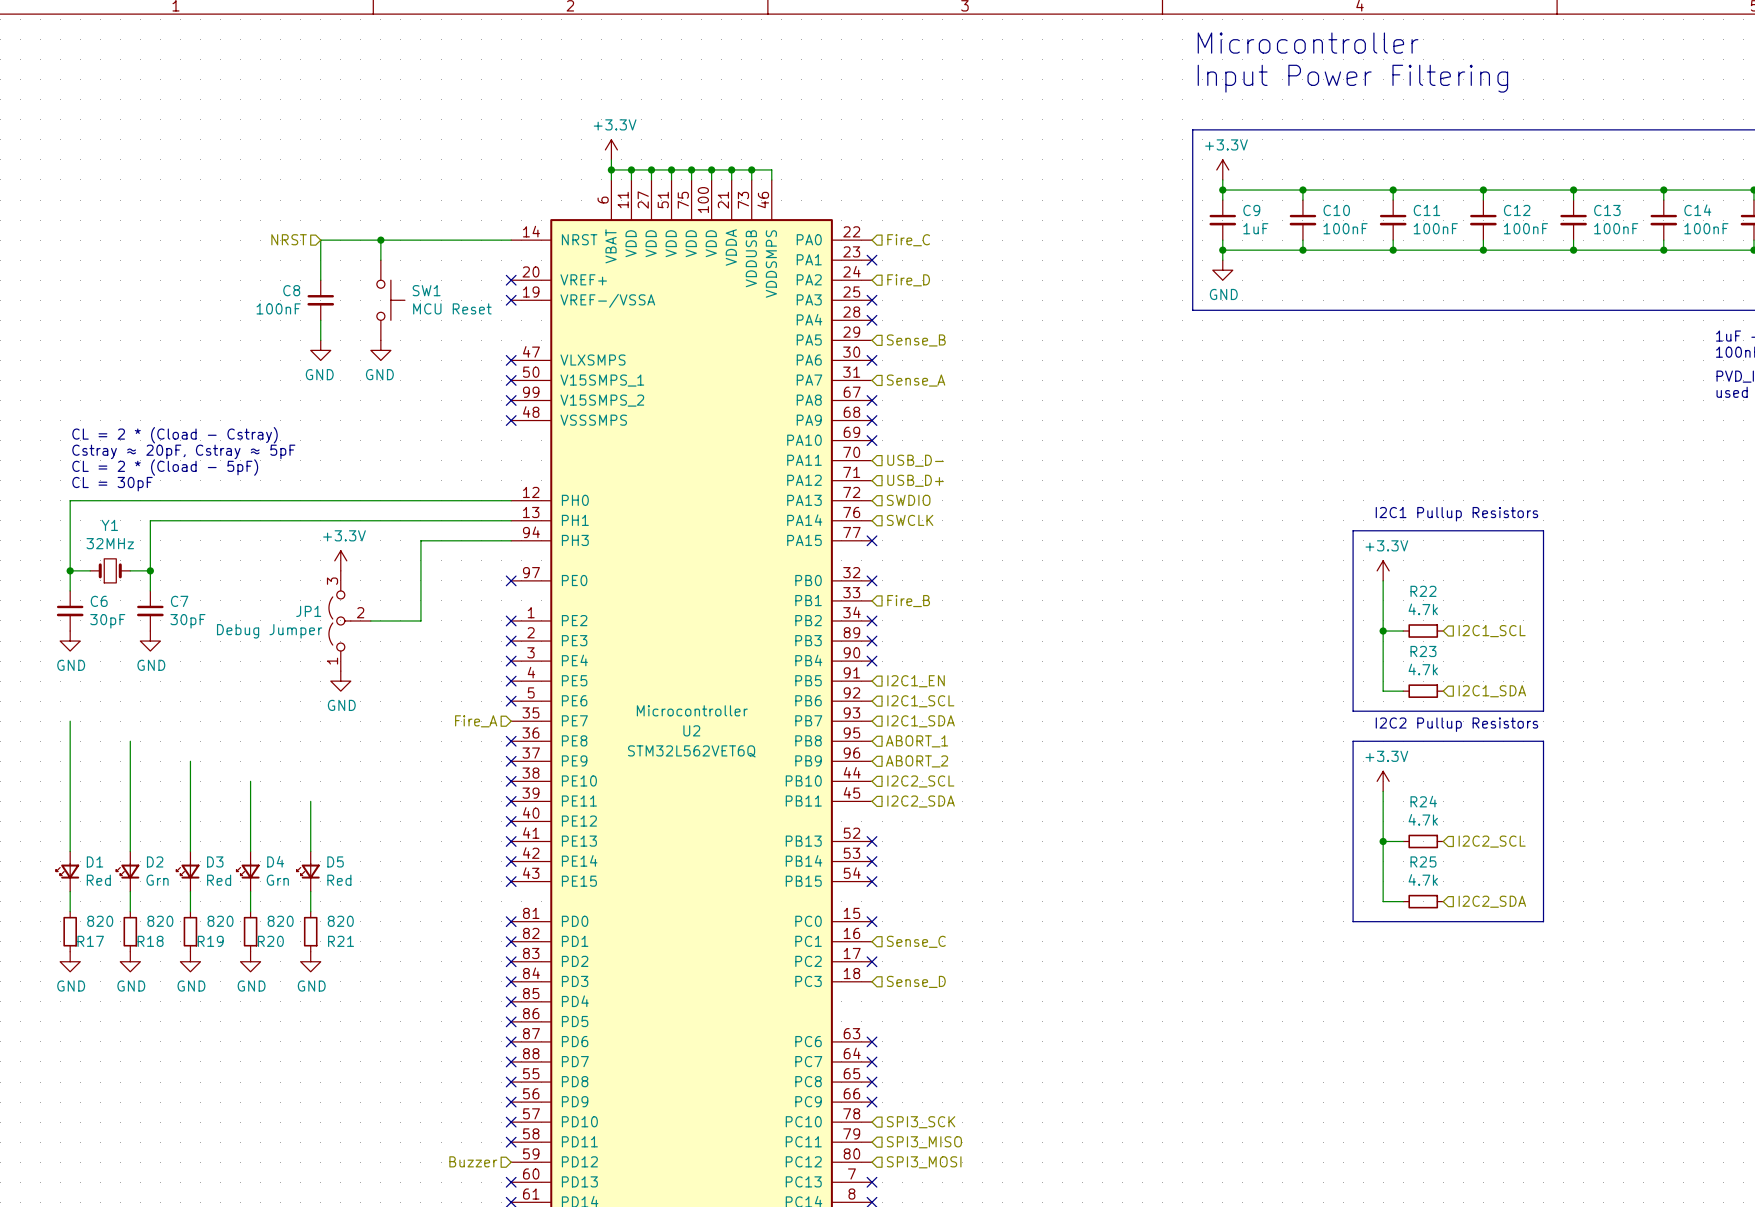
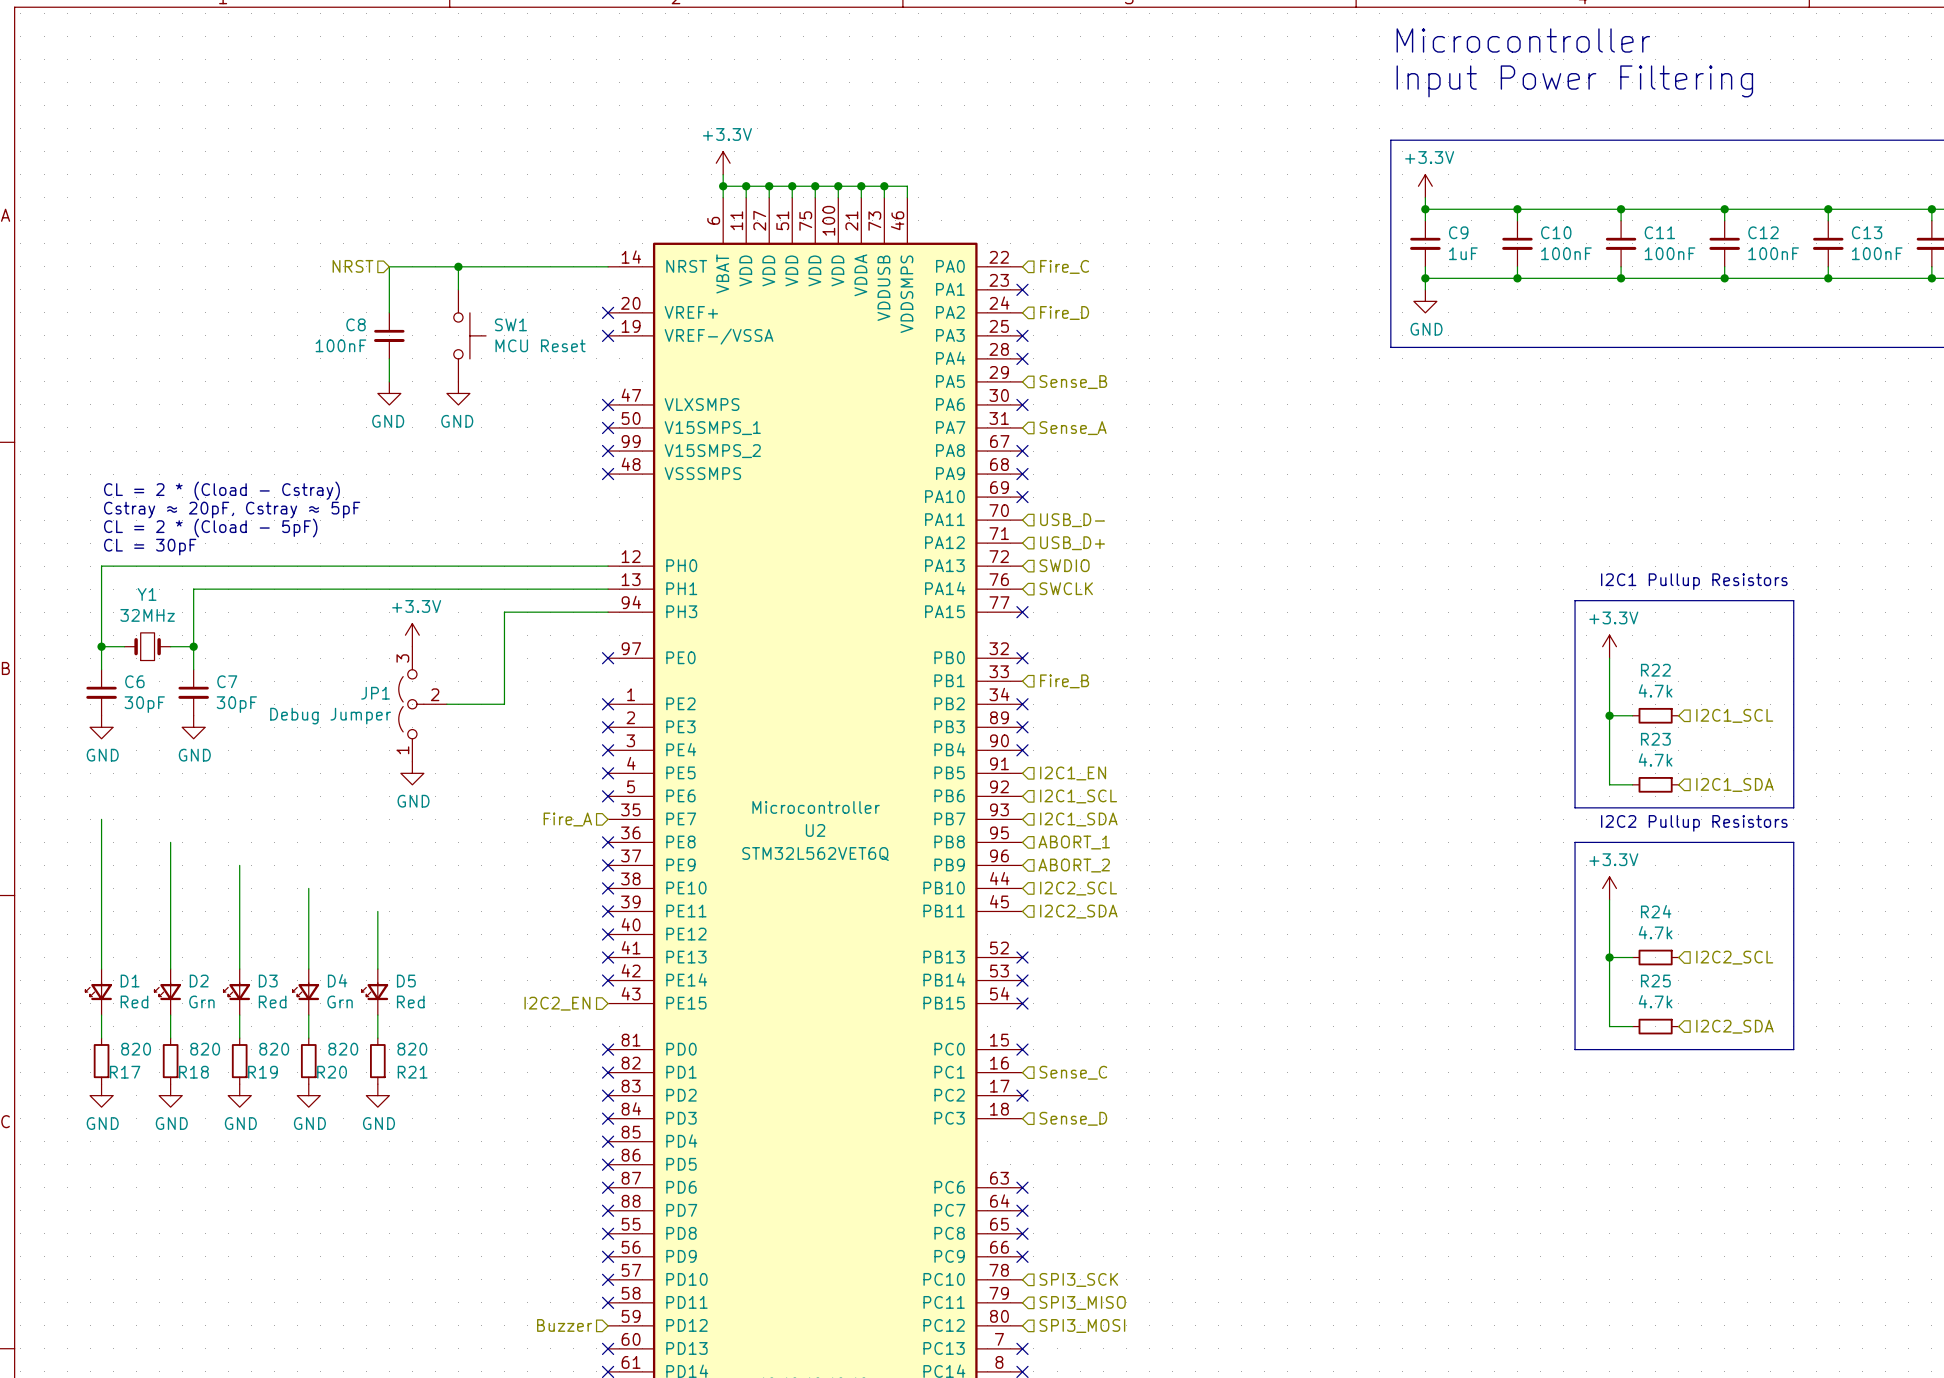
hierarchical label: none -> I2C2_EN (557, 1003)
no-connect mark: (511, 881) -> none

